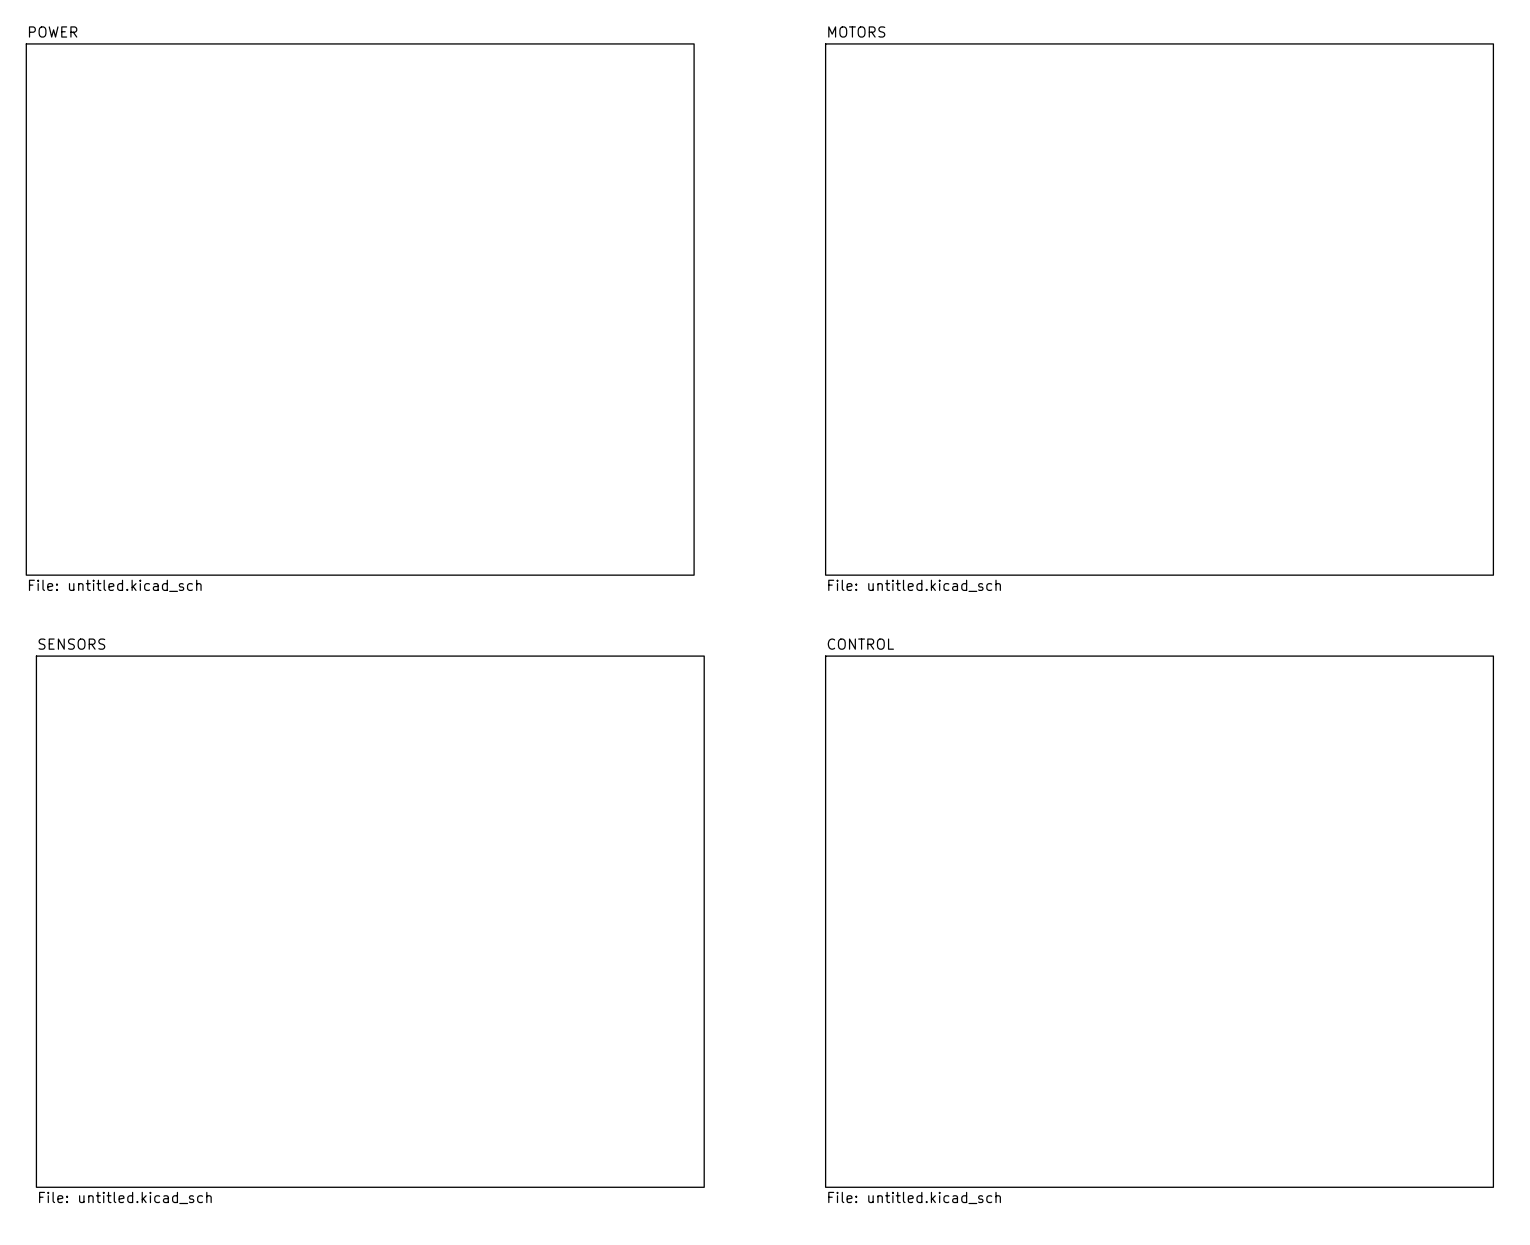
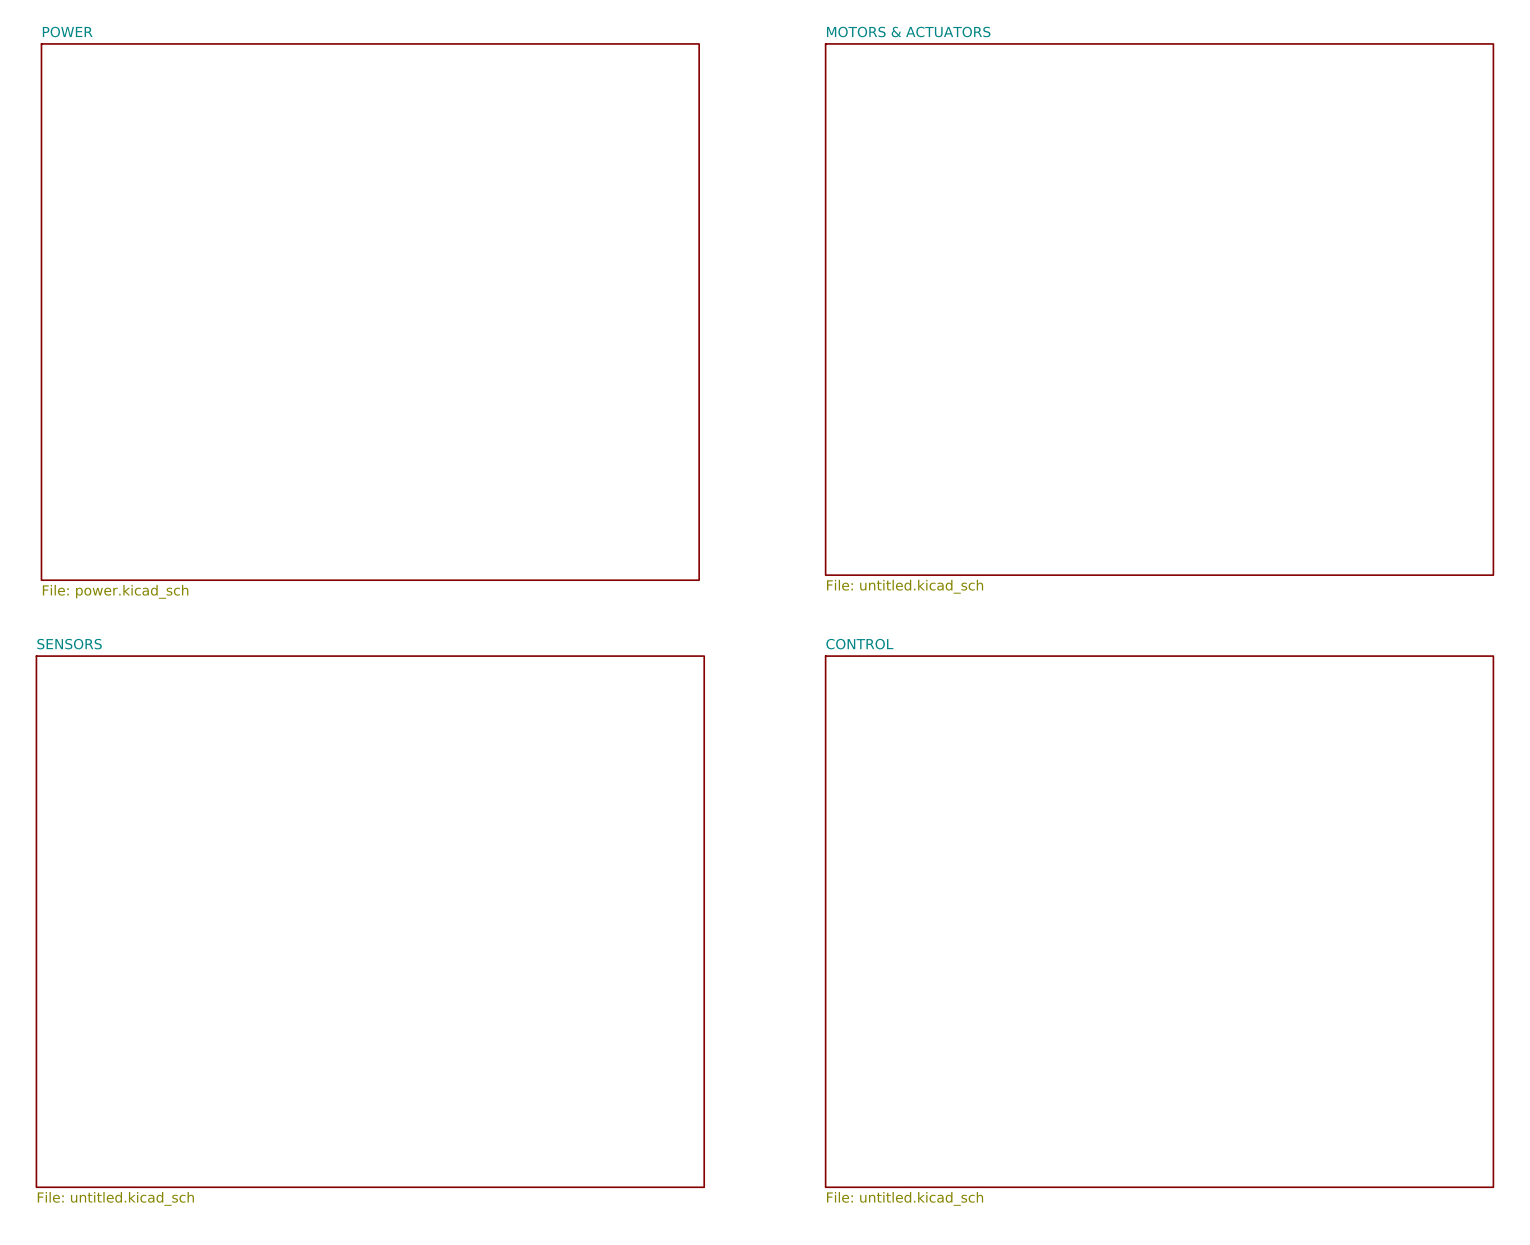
sheet MOTORS name: MOTORS (856, 31) -> MOTORS & ACTUATORS (908, 31)
sheet POWER: File: untitled.kicad_sch (360, 309) -> none
sheet POWER: none -> File: power.kicad_sch (370, 312)

